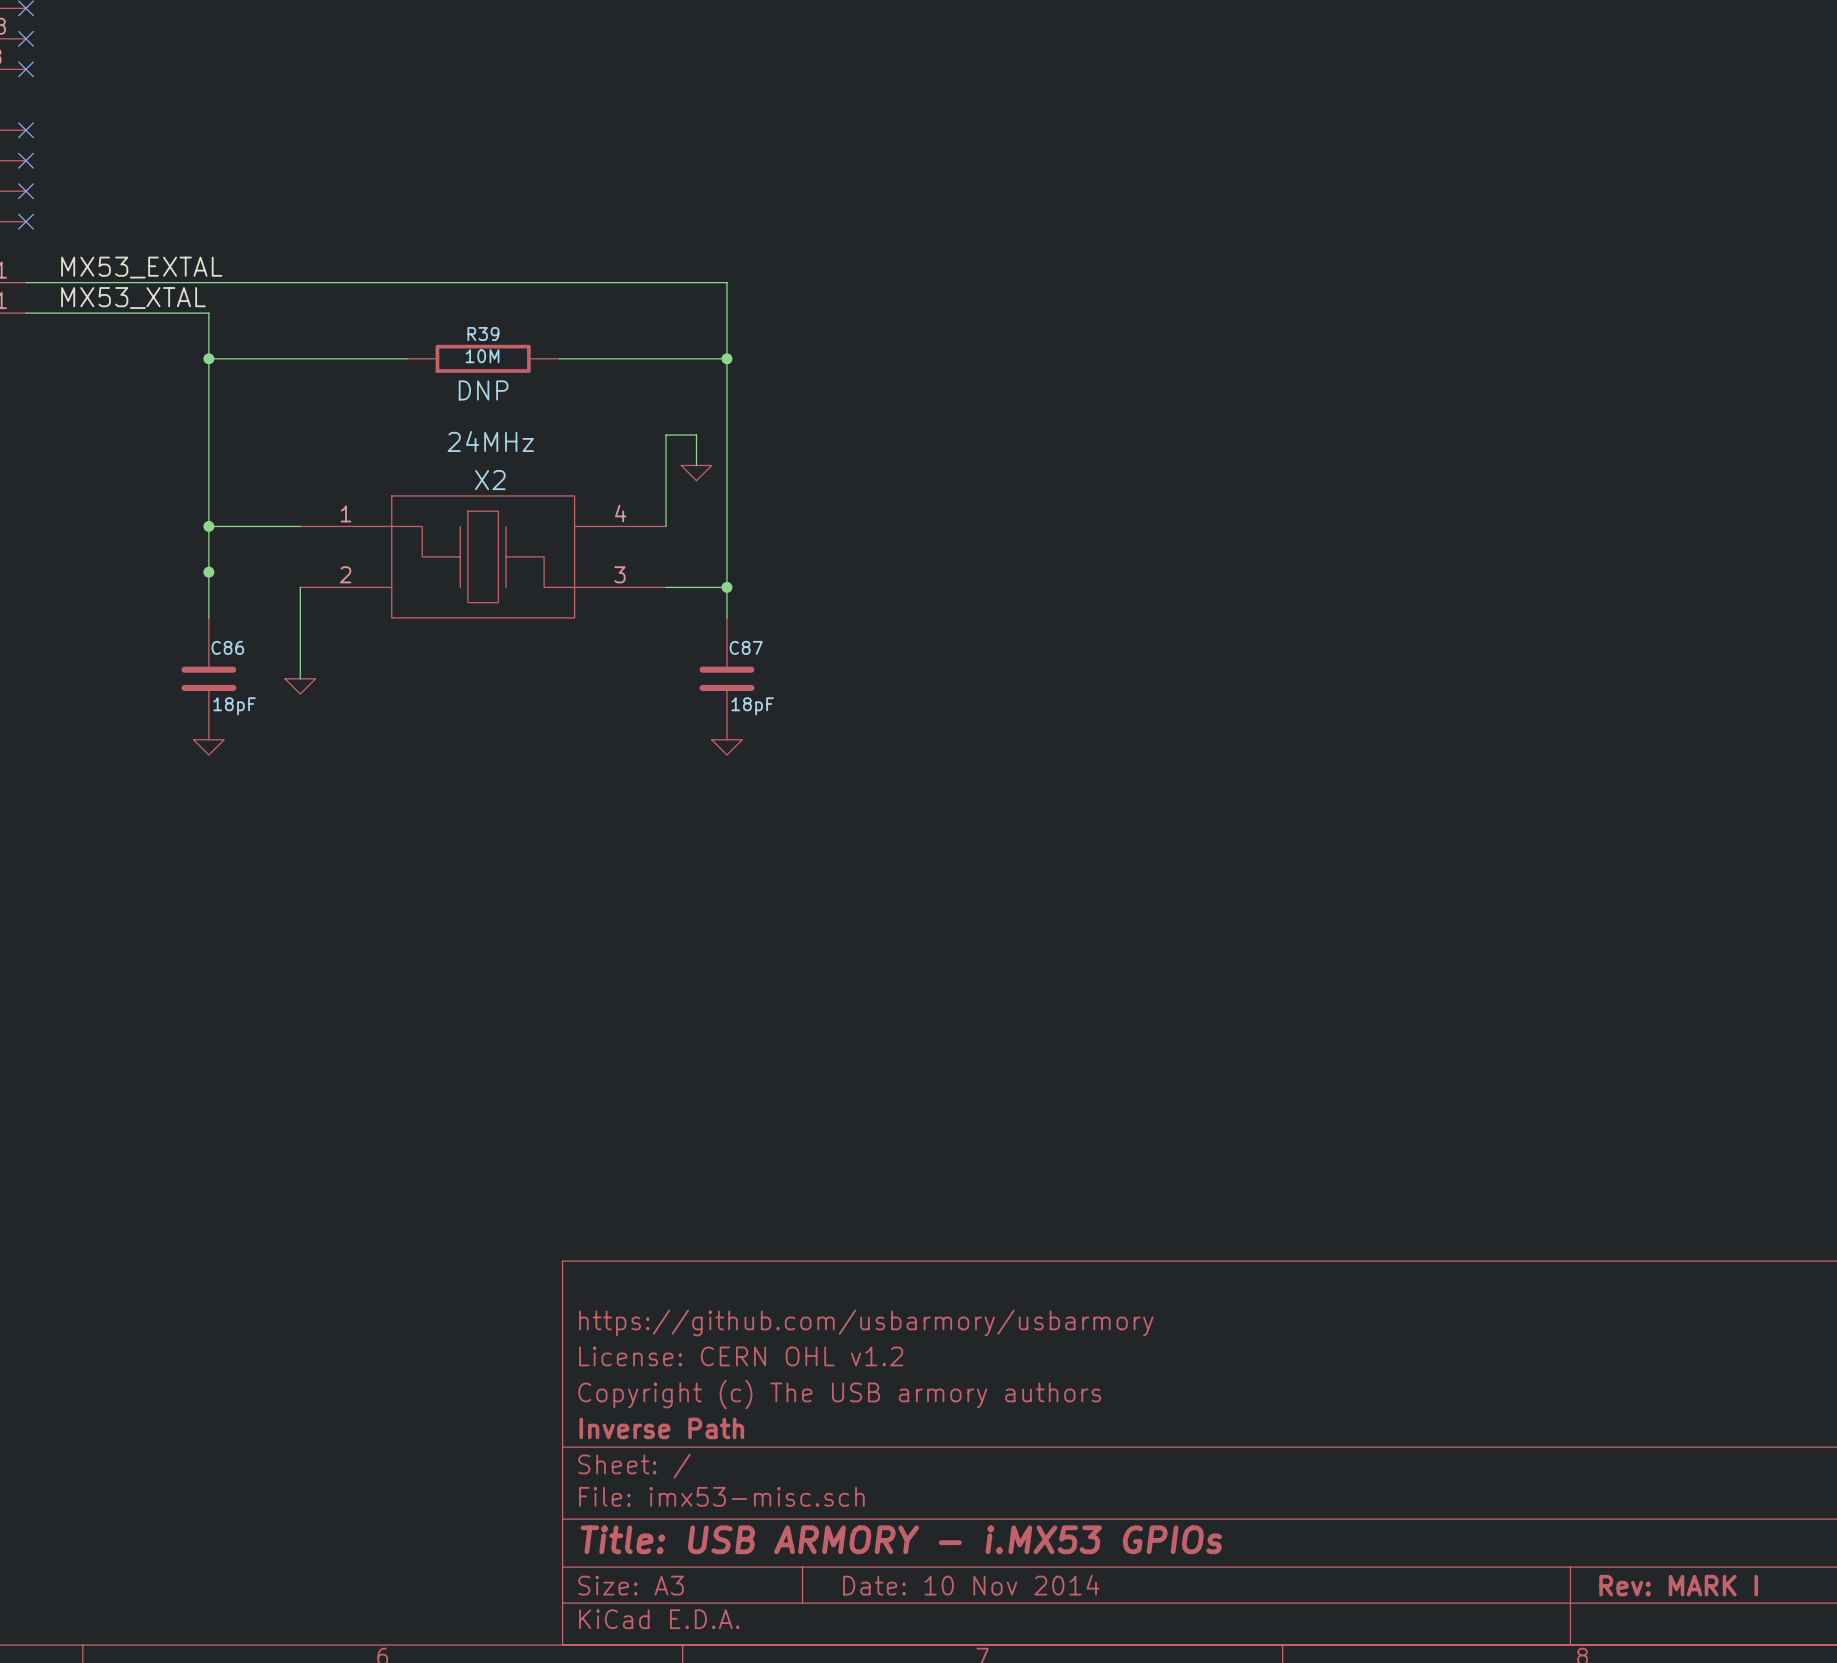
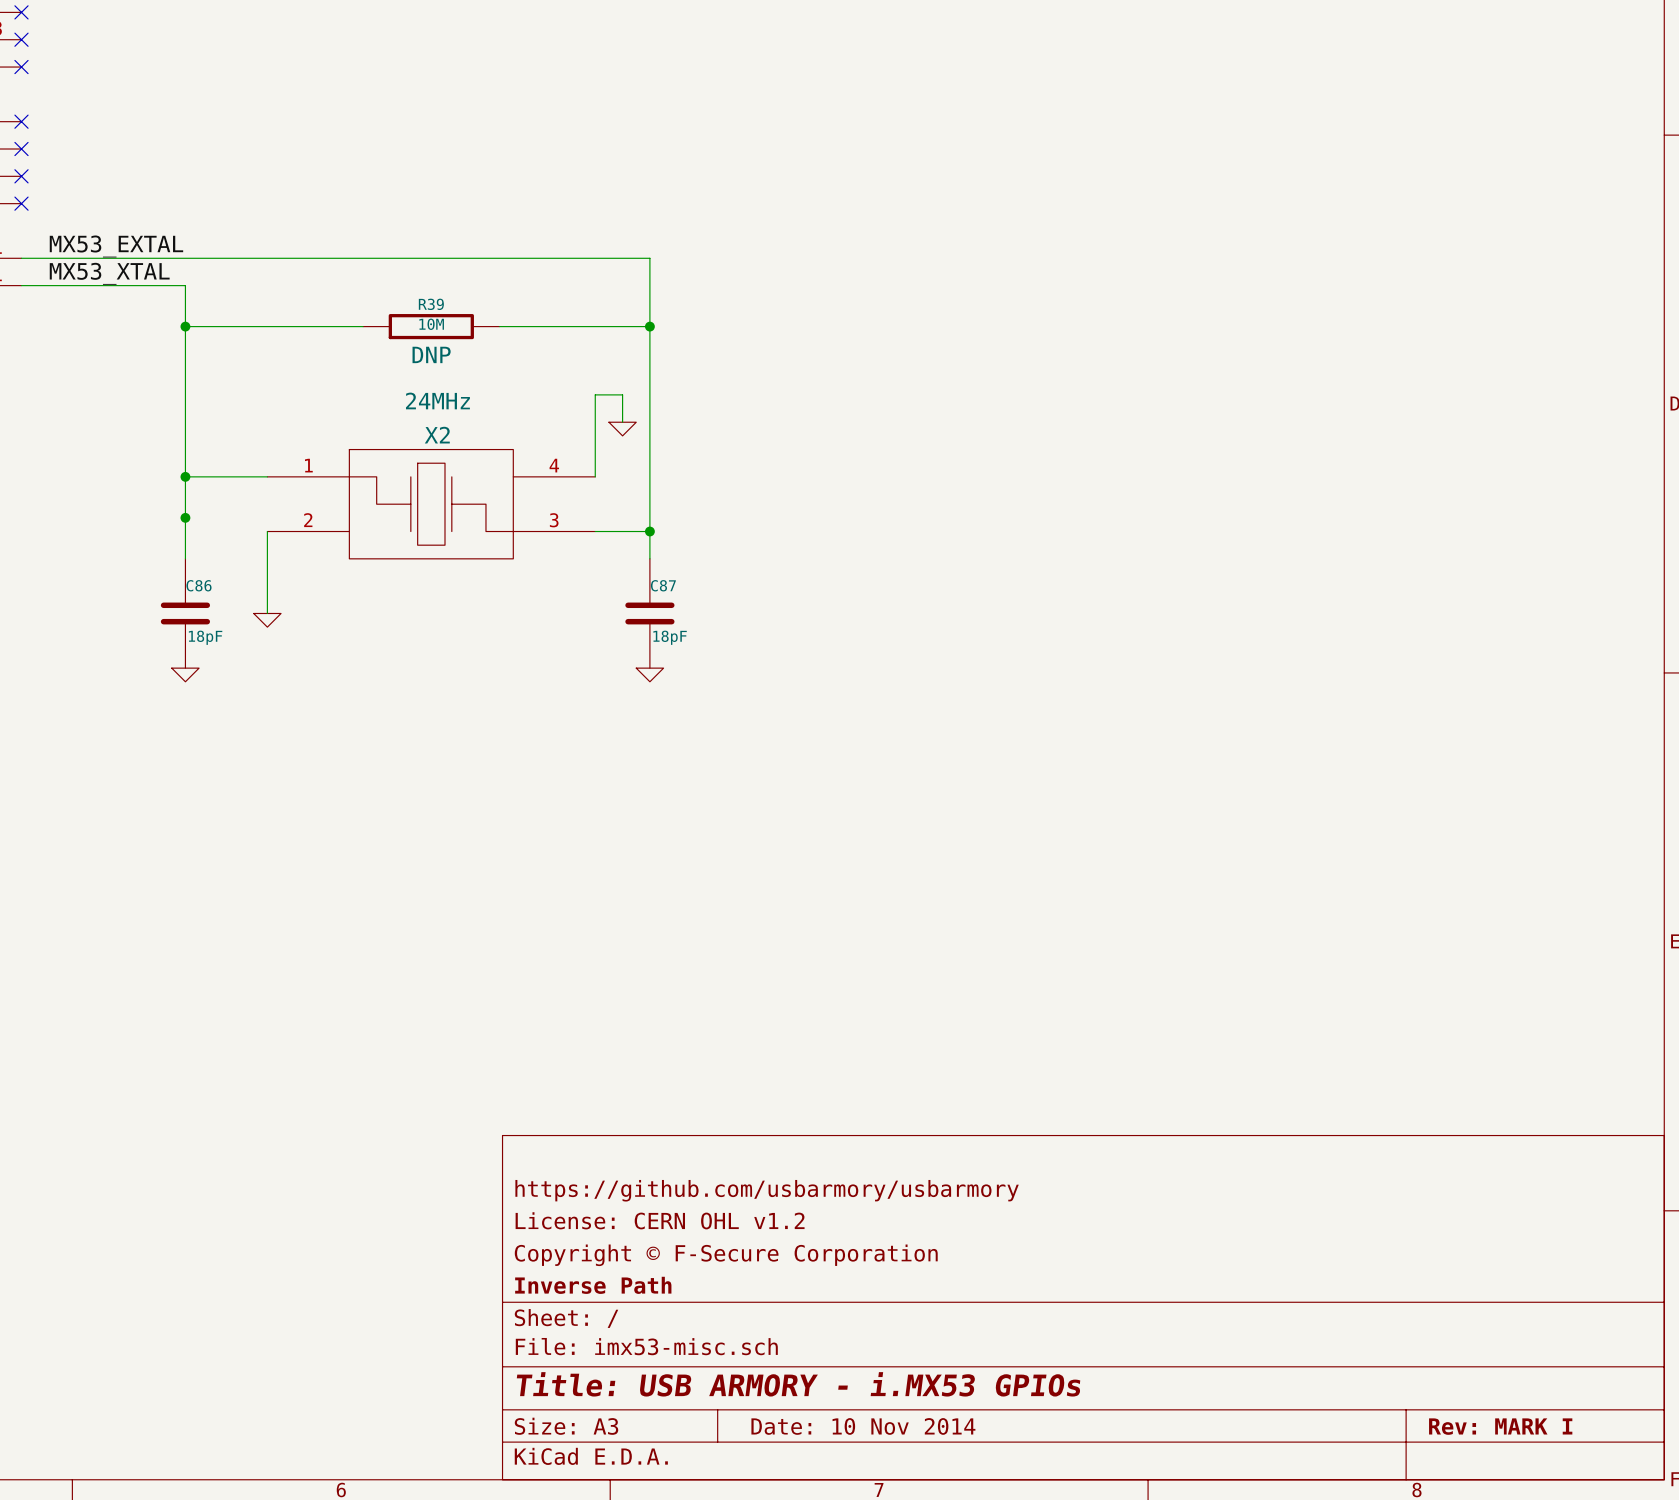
title block: Copyright (c) The USB armory authors (839, 1394) -> Copyright © F-Secure Corporation (726, 1255)

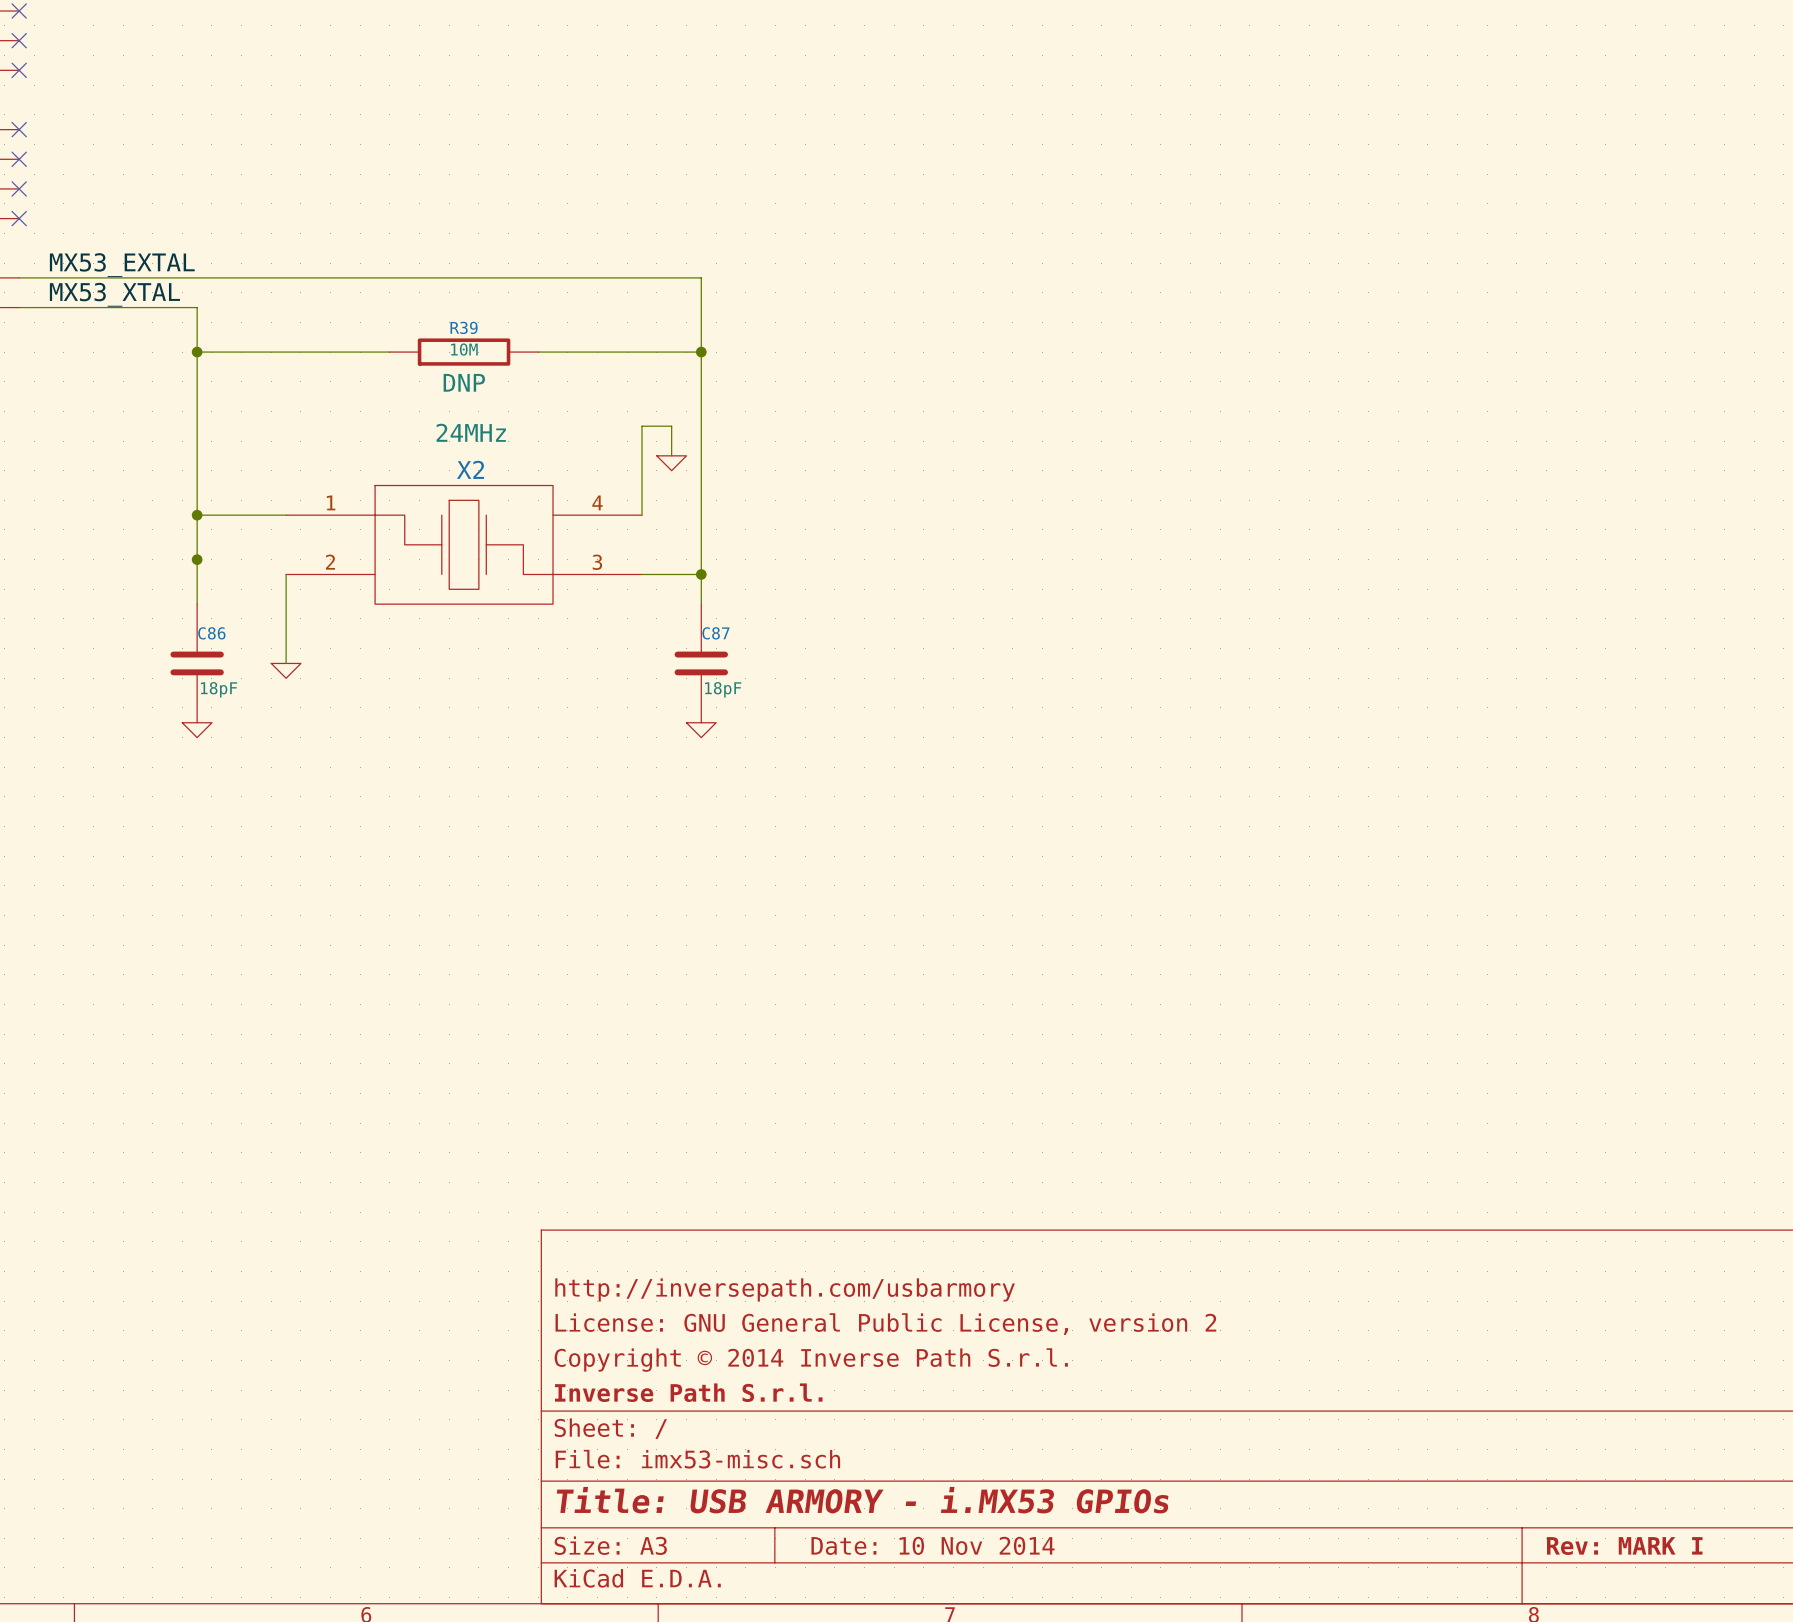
title block: https://github.com/usbarmory/usbarmory (767, 1190) -> http://inversepath.com/usbarmory (785, 1289)
title block: License: CERN OHL v1.2 (660, 1220) -> License: GNU General Public License, version 2 (885, 1324)
title block: Copyright © F-Secure Corporation (726, 1255) -> Copyright © 2014 Inverse Path S.r.l. (811, 1360)
title block: Inverse Path (593, 1285) -> Inverse Path S.r.l. (688, 1392)

